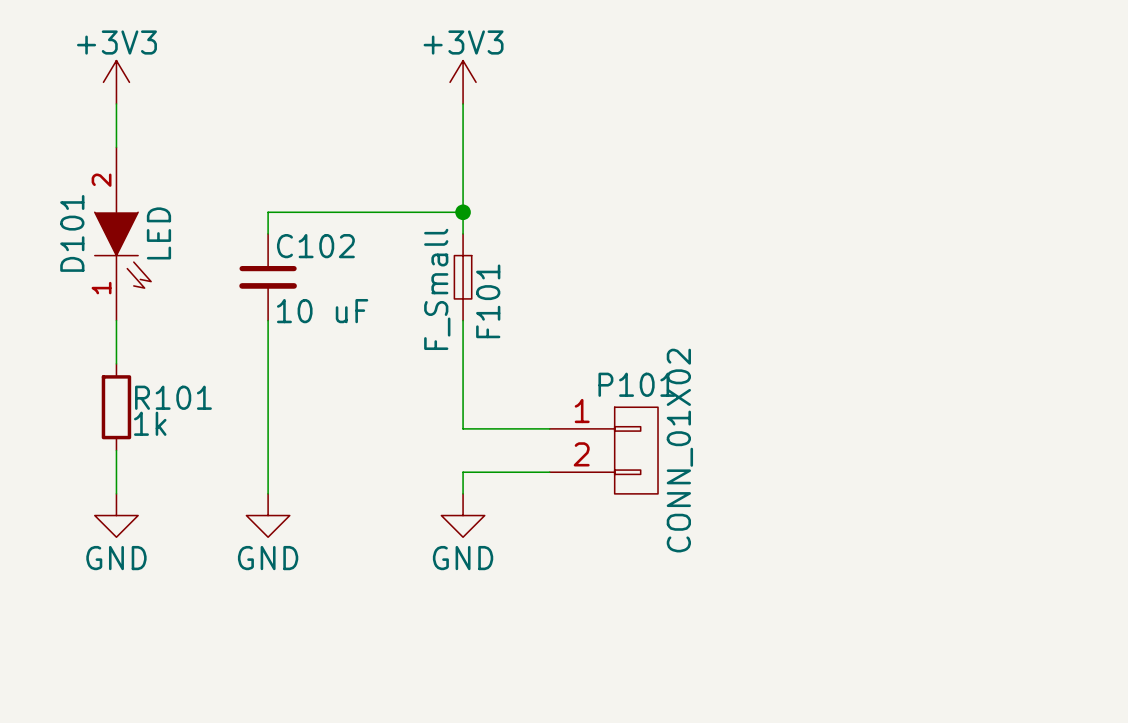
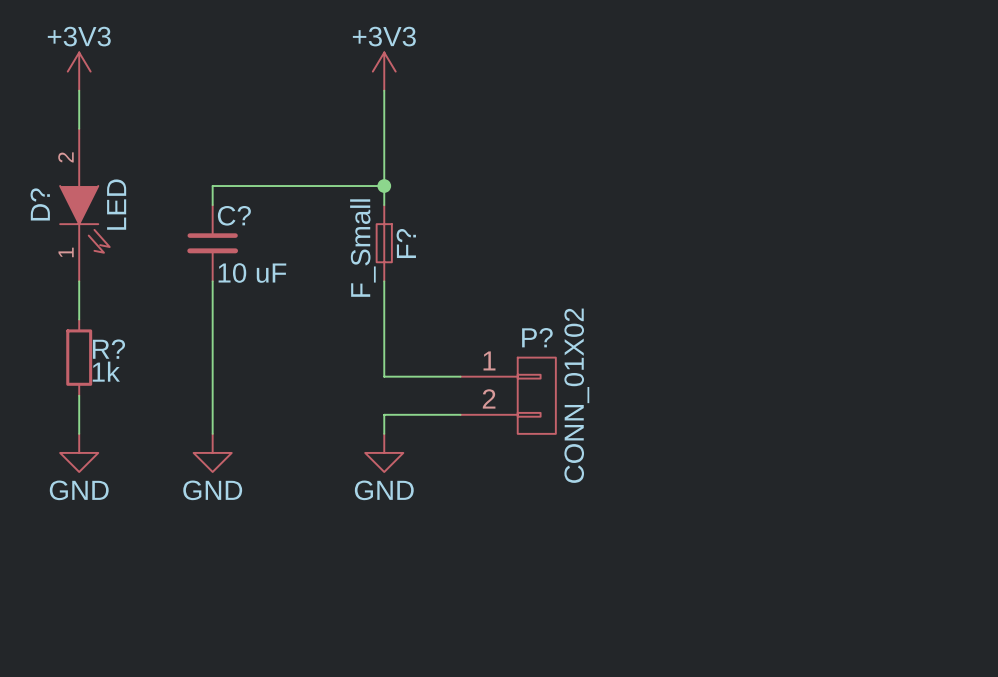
D101 name: D101 (72, 233) -> D? (40, 204)
C102 name: C102 (315, 246) -> C? (234, 215)
F101 name: F101 (488, 301) -> F? (406, 243)
P101 name: P101 (636, 384) -> P? (537, 337)
R101 name: R101 (173, 397) -> R? (108, 349)

